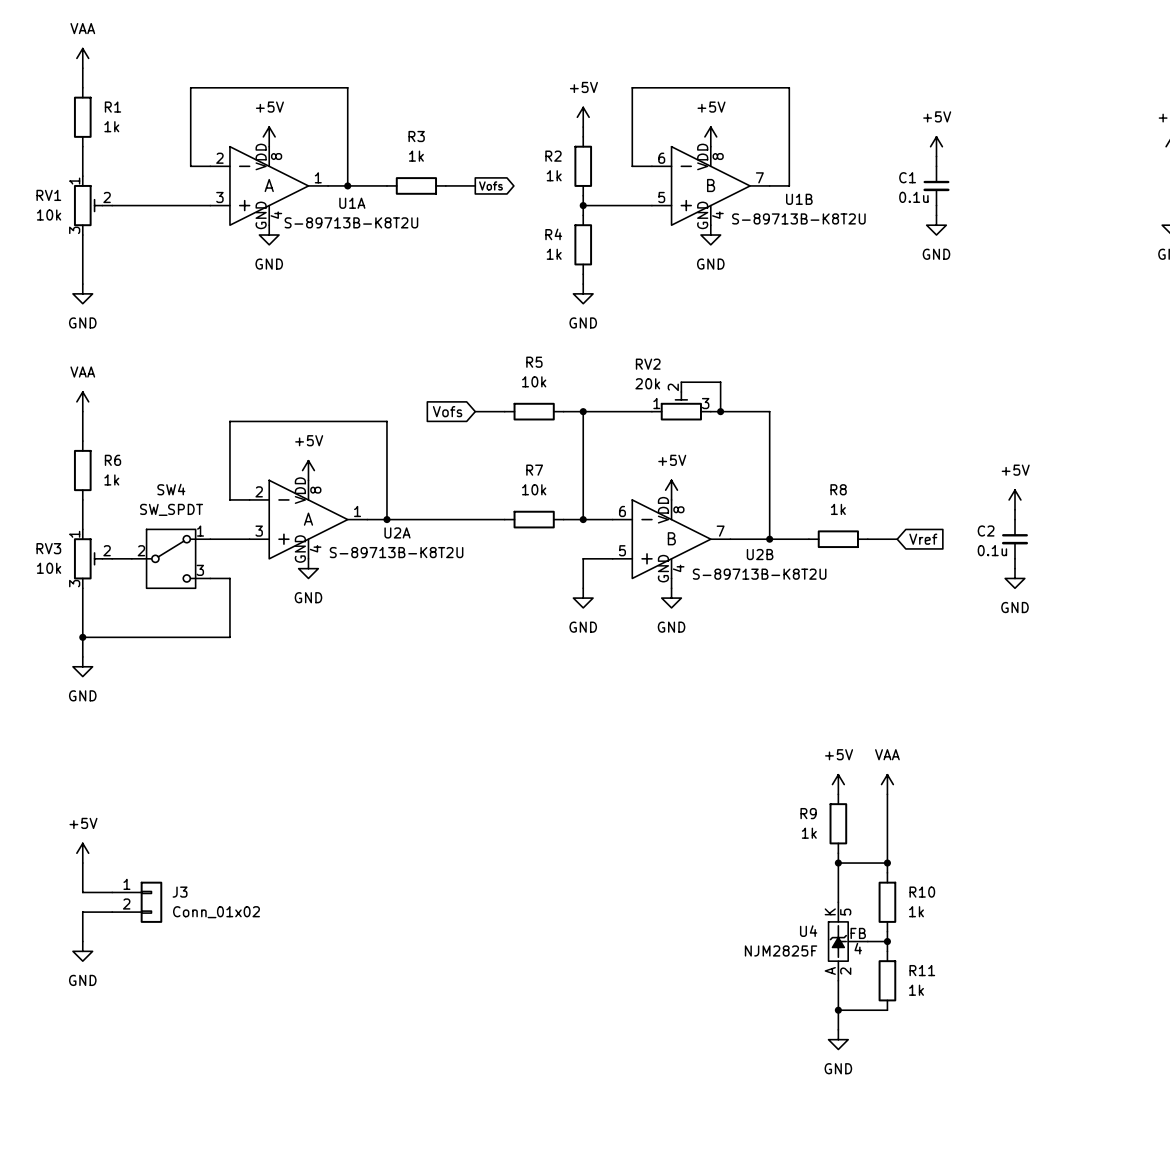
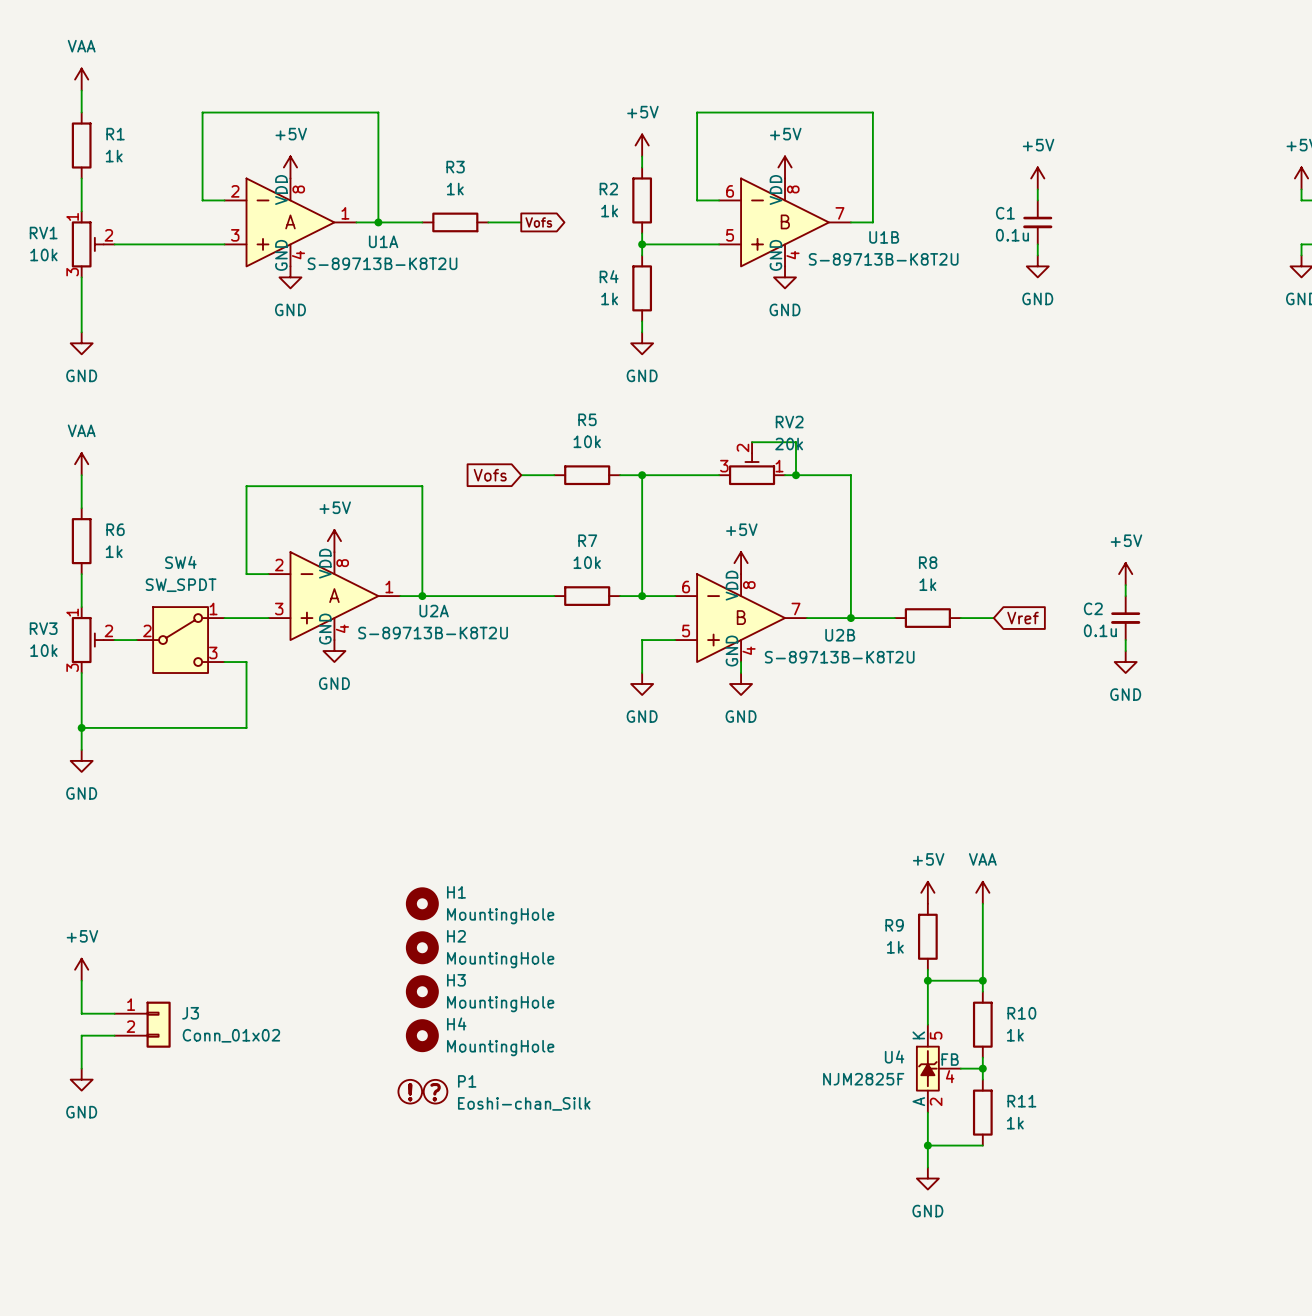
RV2 flip: as is (681, 406) -> left-right (752, 469)
H1: none -> MountingHole (422, 903)
H2: none -> MountingHole (422, 947)
H3: none -> MountingHole (422, 991)
H4: none -> MountingHole (422, 1035)
P1: none -> Eoshi-chan_Silk (422, 1091)

